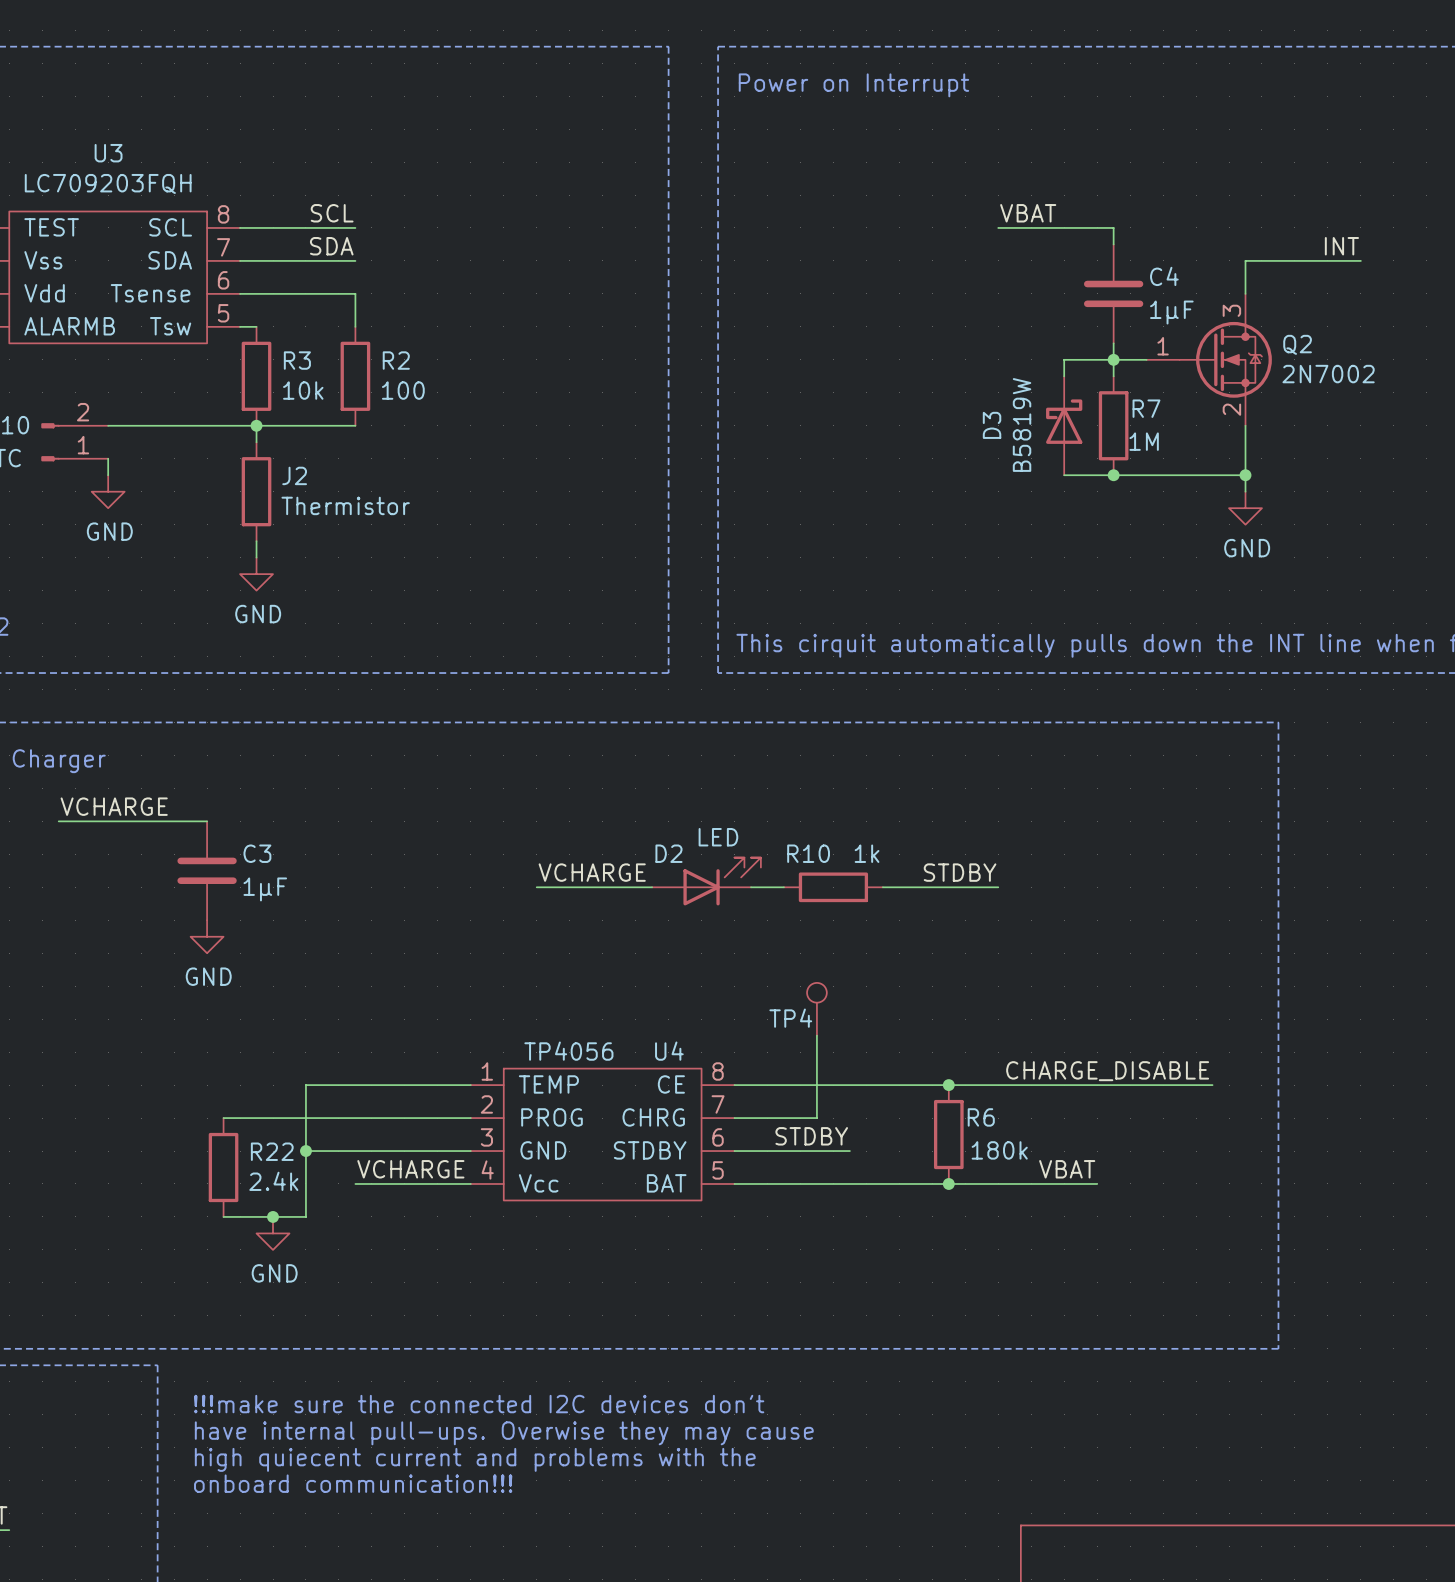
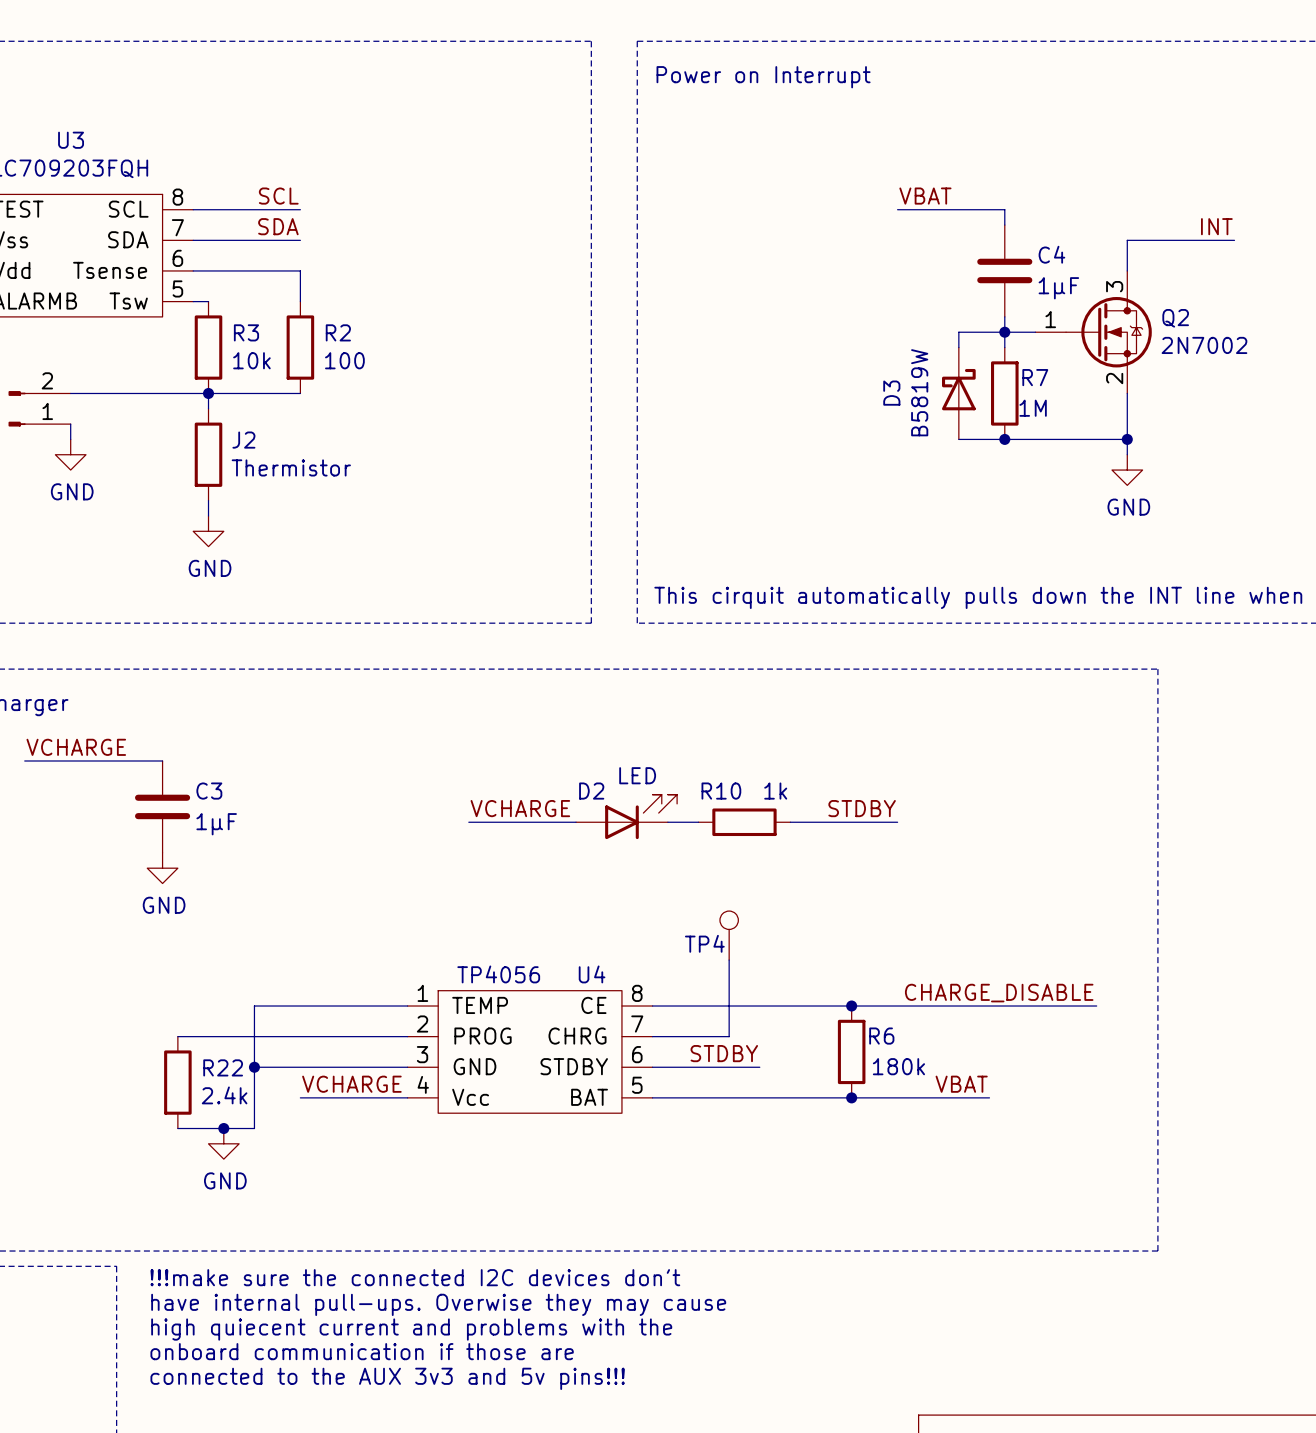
text: none -> !!!make sure the connected I2C devices don't (415, 1277)
text: !!!make sure the connected I2C devices don't (479, 1404) -> have internal pull-ups. Overwise they may cause (438, 1304)
text: have internal pull-ups. Overwise they may cause (504, 1433) -> high quiecent current and problems with the (411, 1329)
text: high quiecent current and problems with the (475, 1459) -> onboard communication if those are (362, 1351)
text: onboard communication!!! (353, 1483) -> connected to the AUX 3v3 and 5v pins!!! (387, 1378)

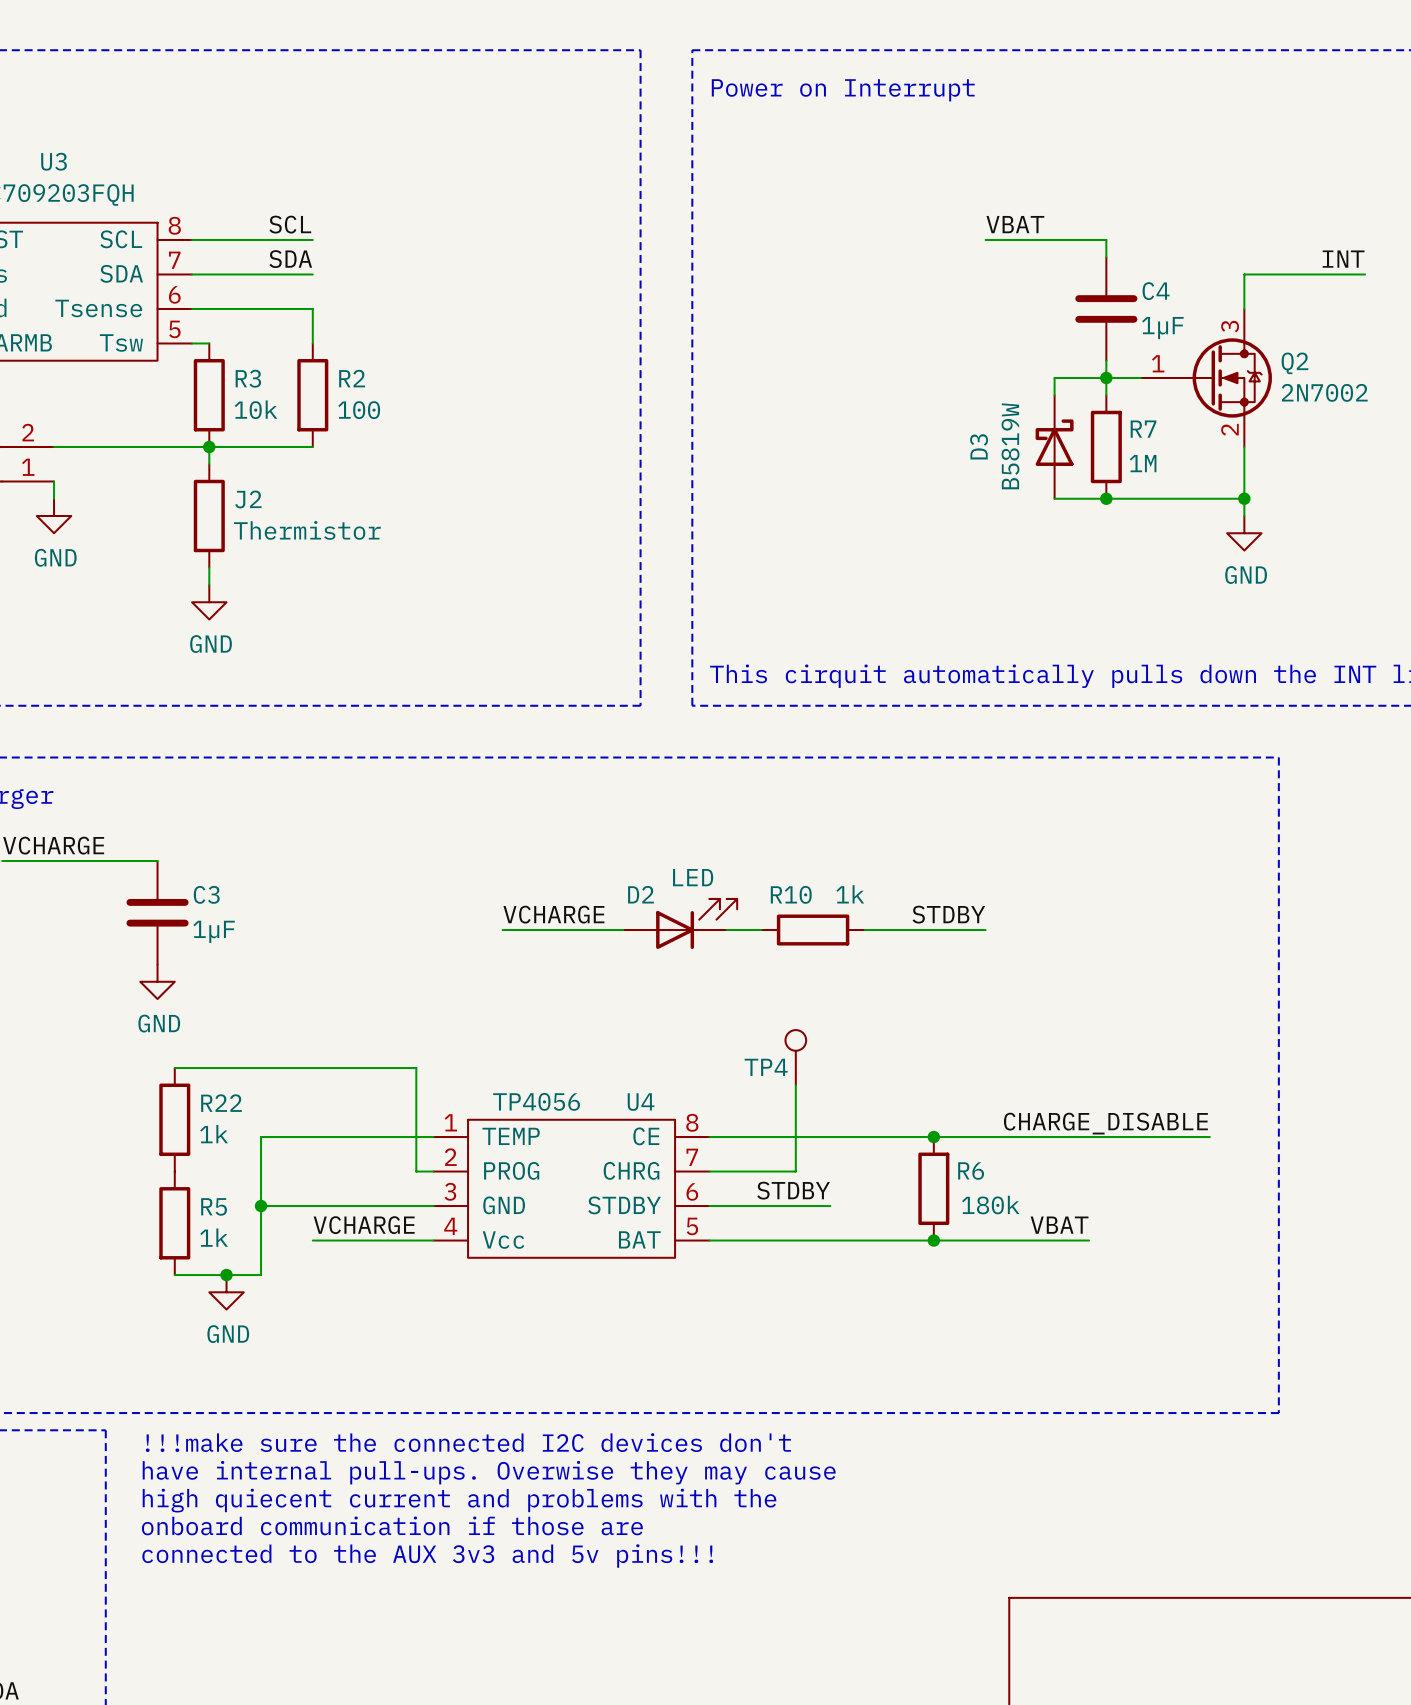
R22: none -> 1k (174, 1119)
wire: (177, 1036) (392, 1036) -> (174, 1068) (416, 1068) (416, 1171)
R22 name: R22 (223, 1067) -> R5 (214, 1206)
R22 value: 2.4k (224, 1095) -> 1k (214, 1237)

